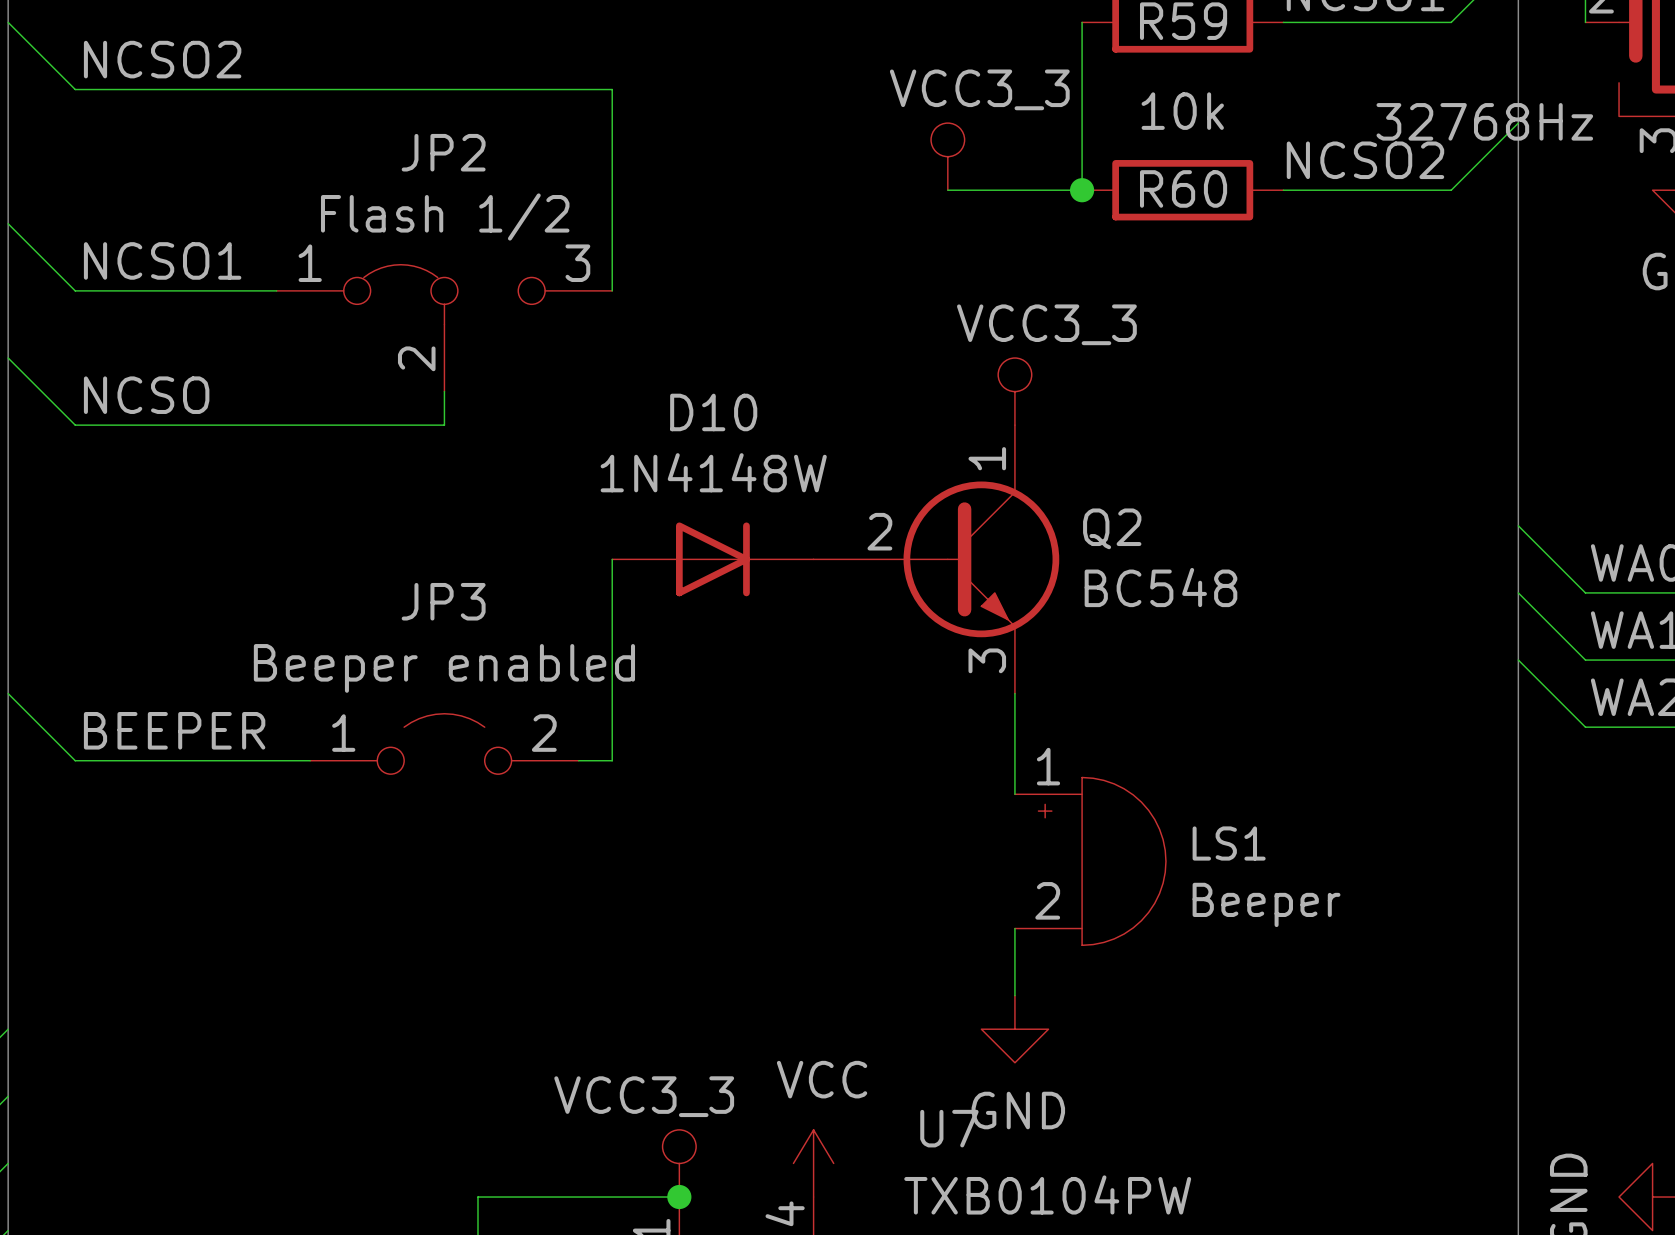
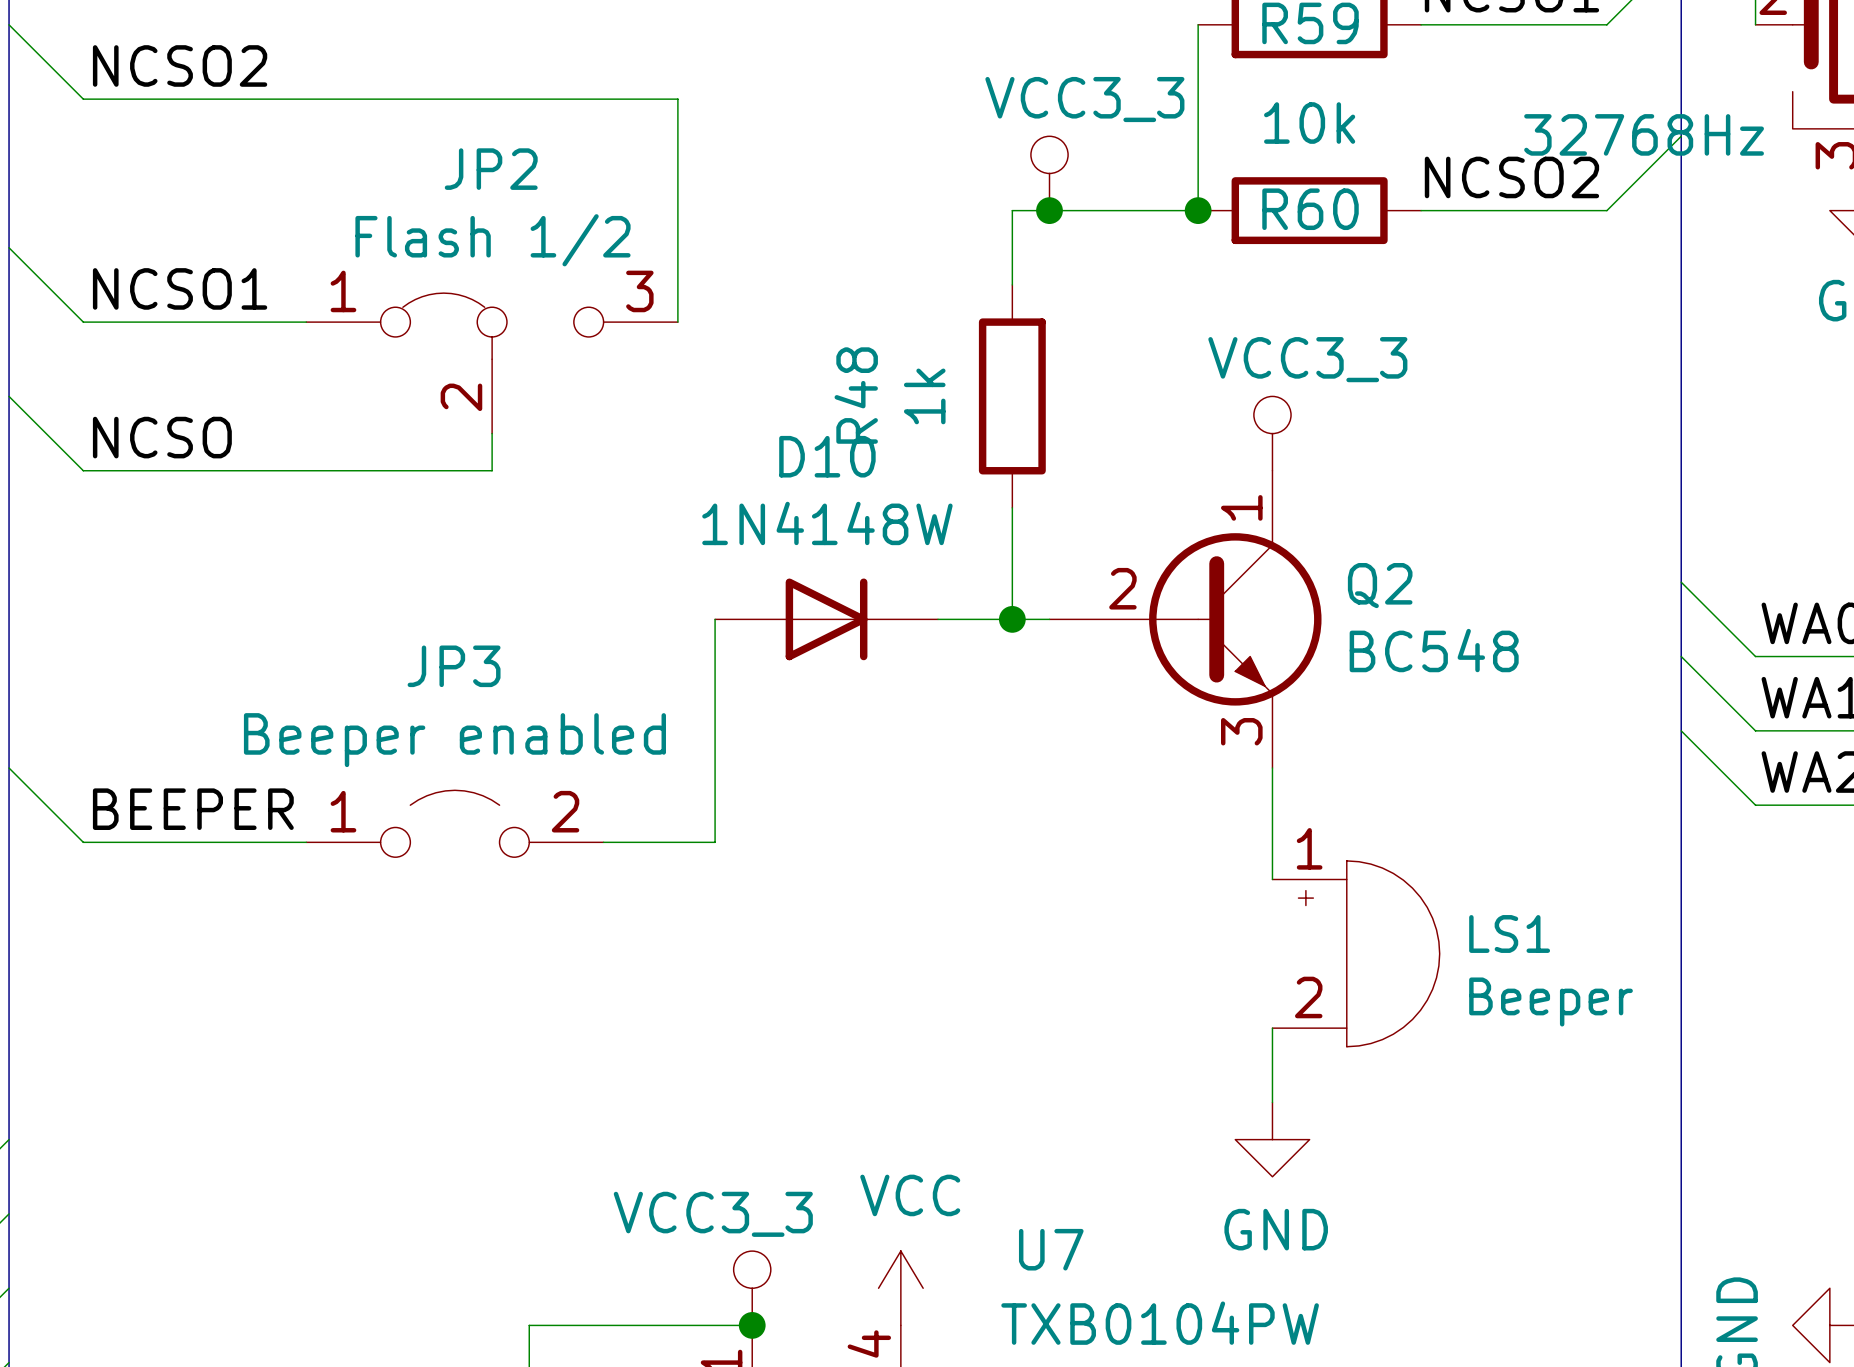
wire: none -> (1049, 210) (1012, 210) (1012, 284)
junction: none -> (1049, 210)
R48: none -> 1k (1012, 396)
power symbol position: VCC3_3 (1014, 391) -> VCC3_3 (1272, 433)
wire: none -> (1012, 507) (1012, 619)
wire: (612, 559) (612, 760) -> (715, 619) (715, 842) (677, 842)
D10 position: (712, 559) -> (826, 619)
junction: none -> (1012, 619)
Q2 position: (936, 559) -> (1185, 619)
wire: (1014, 693) (1014, 794) -> (1272, 768) (1272, 879)
JP3 position: (444, 743) -> (454, 823)
LS1 position: (1090, 861) -> (1356, 953)
wire: (1014, 928) (1014, 995) -> (1272, 1028) (1272, 1102)
power symbol position: GND (1014, 1029) -> GND (1272, 1139)

